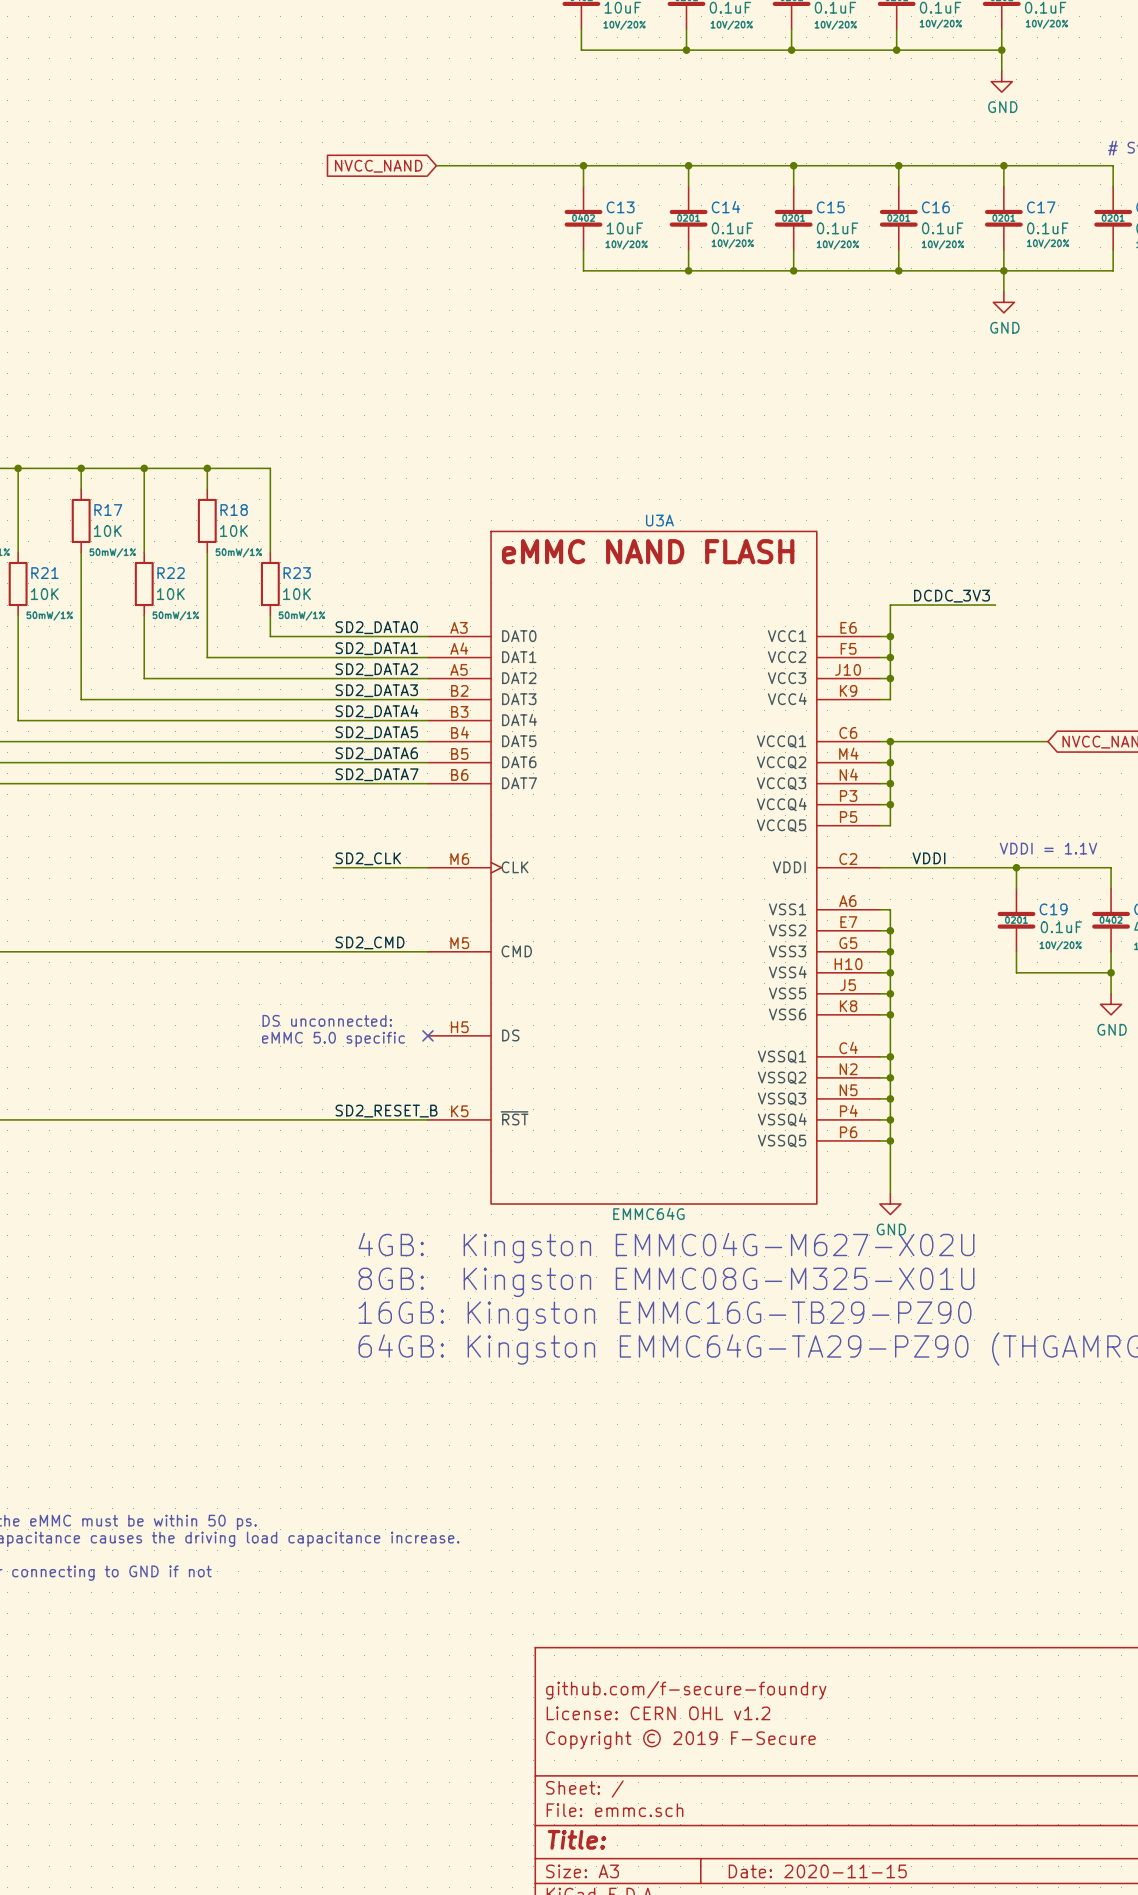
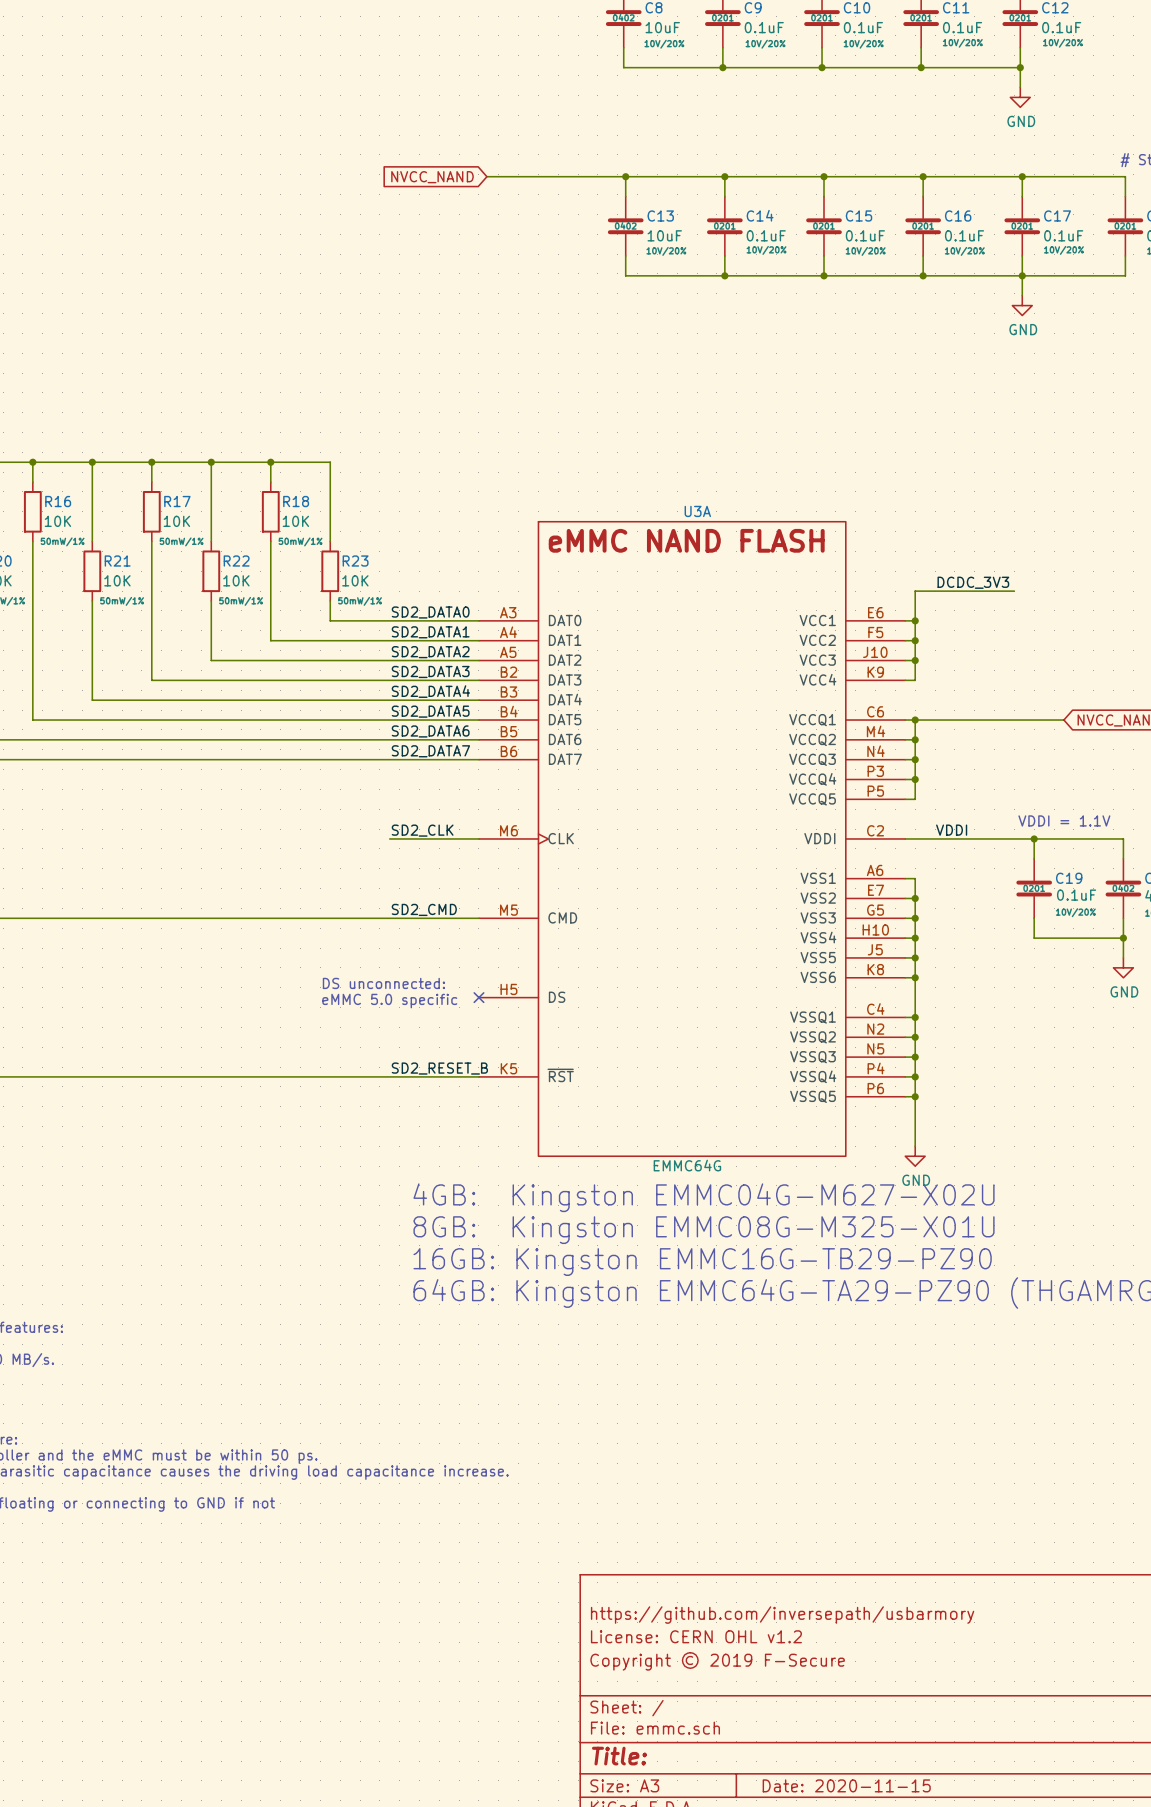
title block: github.com/f-secure-foundry (686, 1690) -> https://github.com/inversepath/usbarmory (782, 1615)

